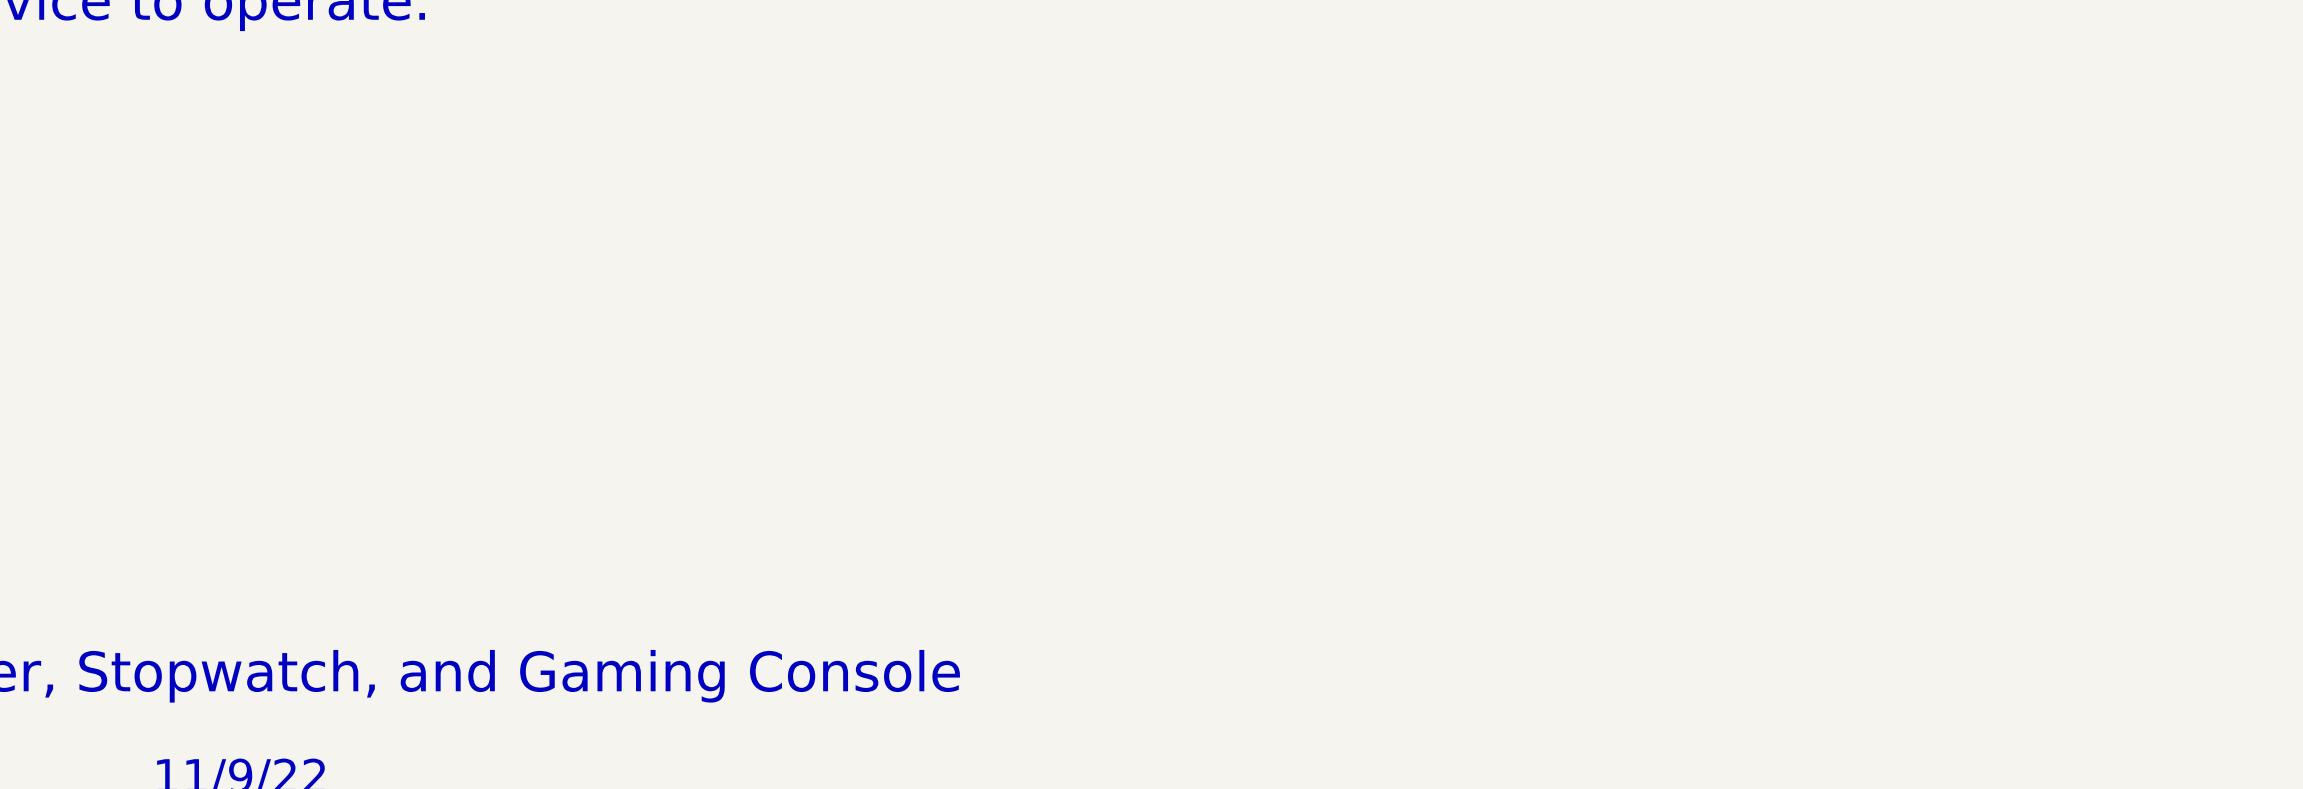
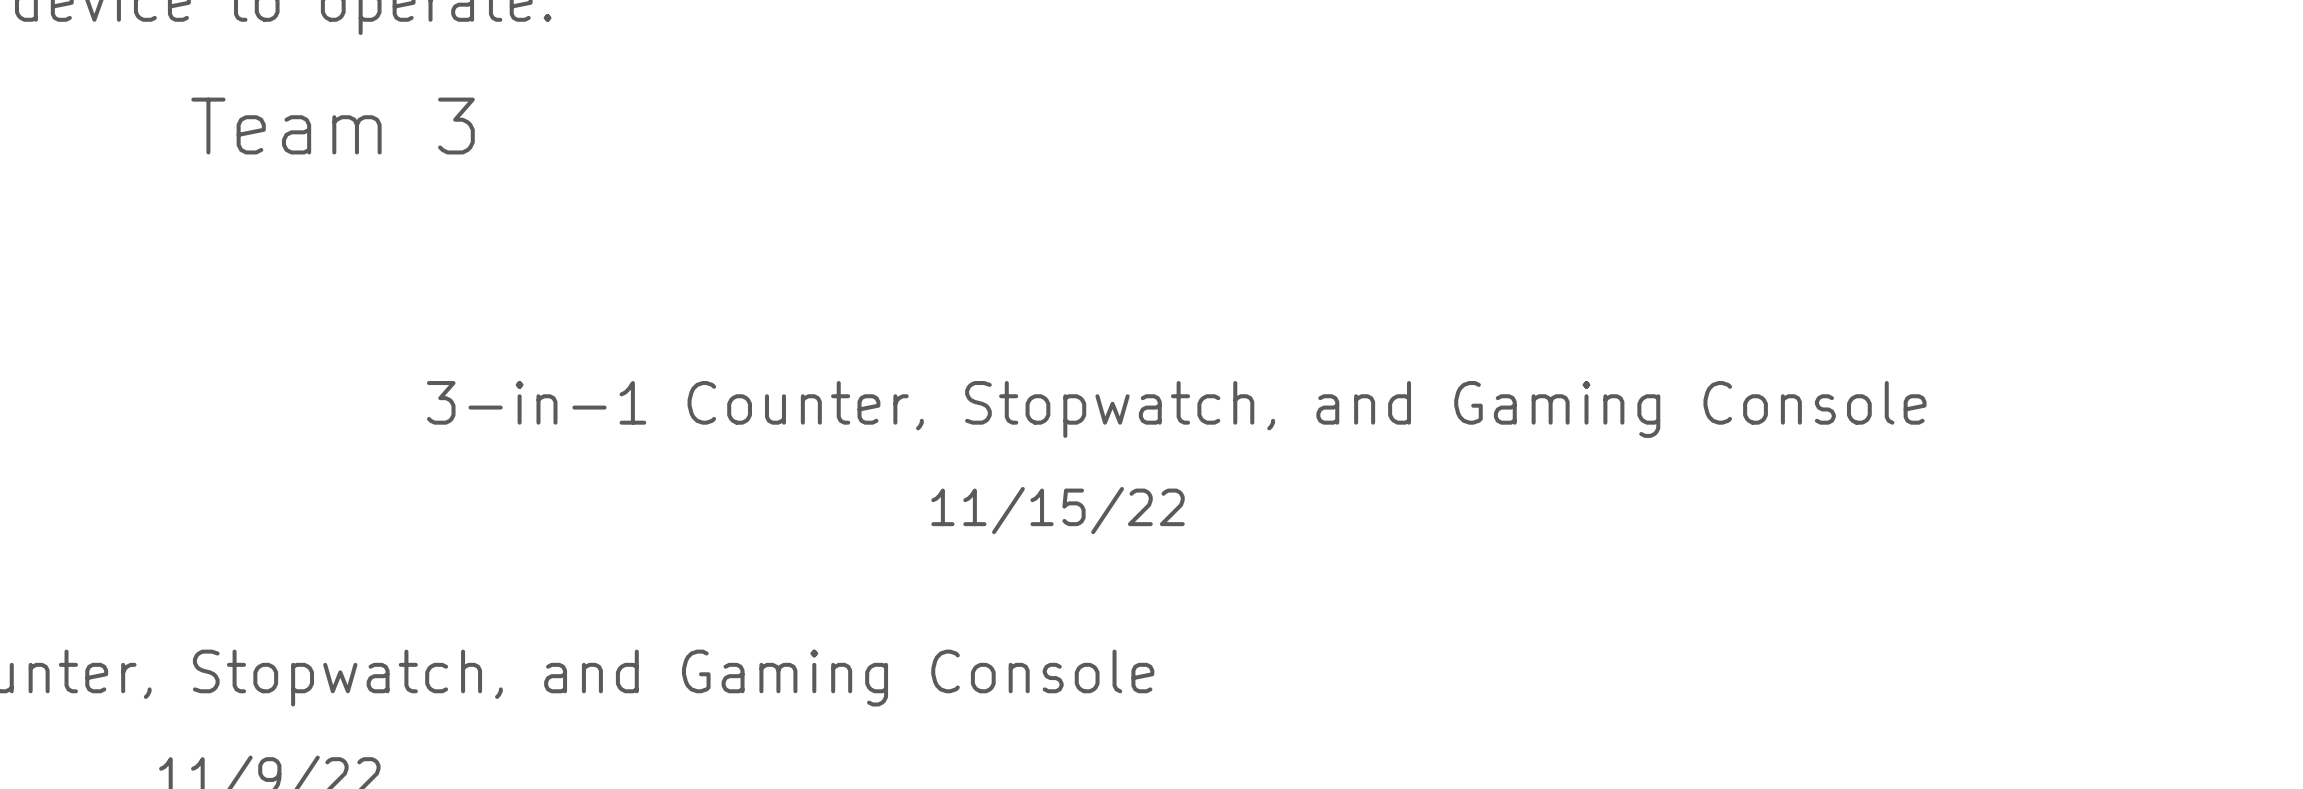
text: none -> Team 3 (333, 126)
text: none -> 3-in-1 Counter, Stopwatch, and Gaming Console (1176, 409)
text: none -> 11/15/22 (1058, 510)

